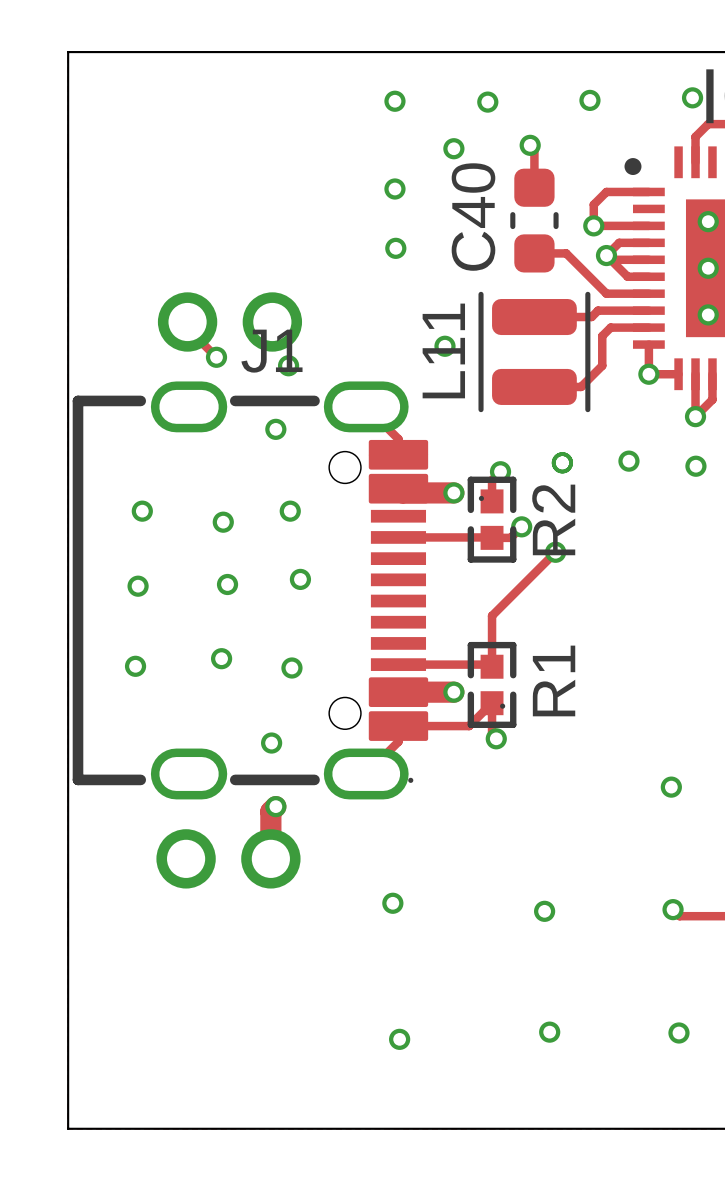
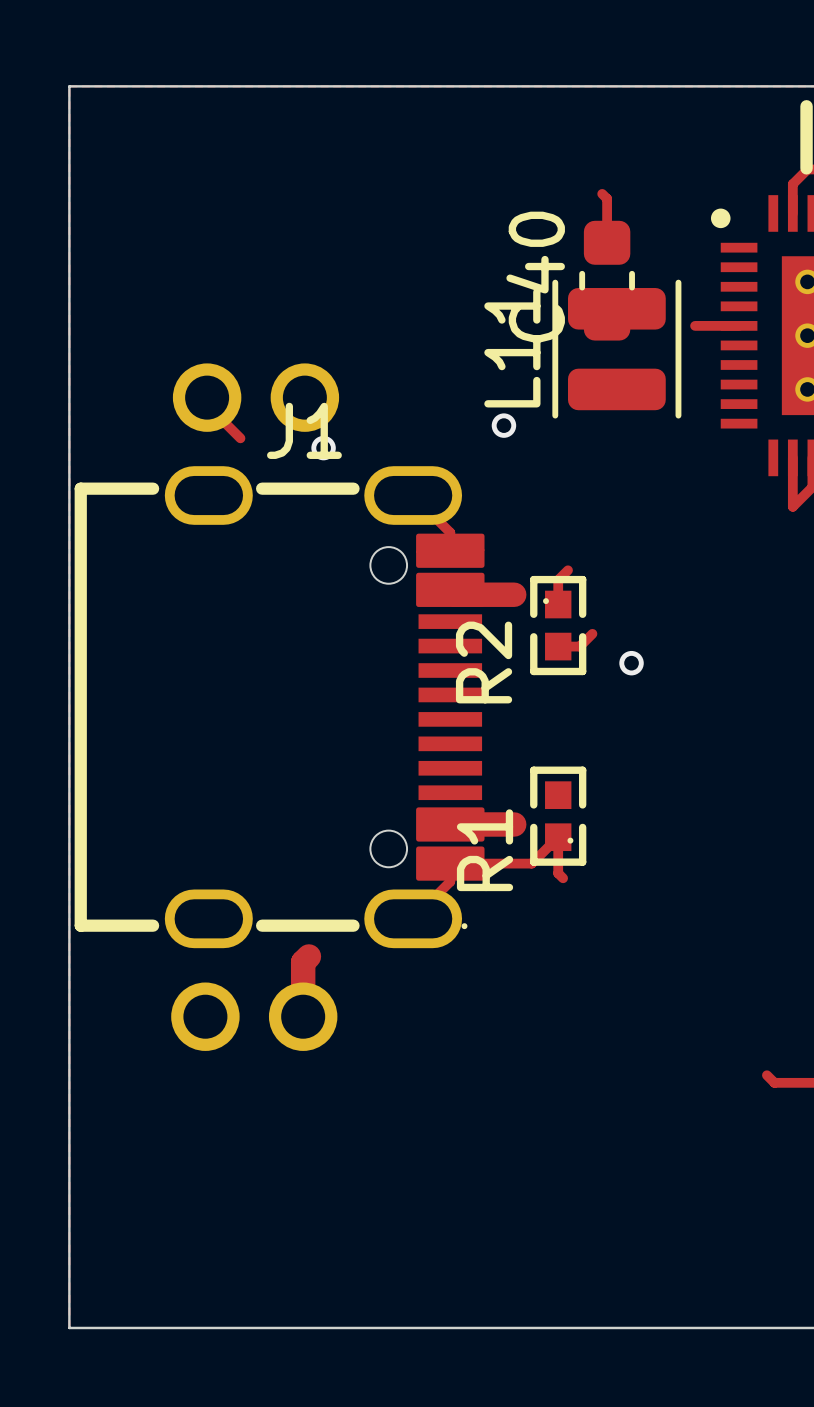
via: (692, 97) -> none
via: (589, 100) -> none
via: (394, 101) -> none
via: (487, 102) -> none
via: (530, 145) -> none
via: (453, 148) -> none
via: (394, 188) -> none
track: (648, 191) (606, 191) (593, 204) (593, 225) (648, 225) -> none
via: (593, 225) -> none
track: (648, 242) (619, 242) (606, 255) (627, 276) (648, 276) -> none
via: (395, 248) -> none
track: (534, 253) (566, 253) (606, 293) (648, 293) -> none
via: (606, 255) -> none
track: (648, 310) (598, 310) (591, 317) (534, 317) -> none
track: (648, 327) (610, 327) (602, 336) (602, 365) (581, 386) (534, 386) -> none
track: (648, 344) (648, 374) (678, 374) -> none
L11 position: (534, 351) -> (616, 349)
via: (216, 357) -> none
via: (648, 374) -> none
via: (695, 416) -> none
via: (275, 429) -> none
via: (628, 461) -> none
via: (562, 462) -> none
via: (695, 466) -> none
via: (500, 471) -> none
via: (453, 492) -> none
via: (142, 511) -> none
via: (290, 511) -> none
R2 name position: R2 (553, 519) -> R2 (484, 662)
via: (223, 522) -> none
via: (521, 526) -> none
track: (398, 537) (491, 537) -> none
track: (555, 552) (492, 615) (492, 666) (489, 664) (398, 664) -> none
via: (300, 579) -> none
via: (227, 584) -> none
via: (138, 586) -> none
via: (221, 658) -> none
via: (135, 666) -> none
via: (291, 668) -> none
R1 name position: R1 (554, 680) -> R1 (485, 850)
via: (453, 692) -> none
via: (496, 738) -> none
via: (271, 743) -> none
via: (671, 787) -> none
via: (275, 806) -> none
via: (392, 903) -> none
via: (673, 909) -> none
via: (544, 911) -> none
via: (549, 1032) -> none
via: (678, 1032) -> none
via: (399, 1039) -> none

